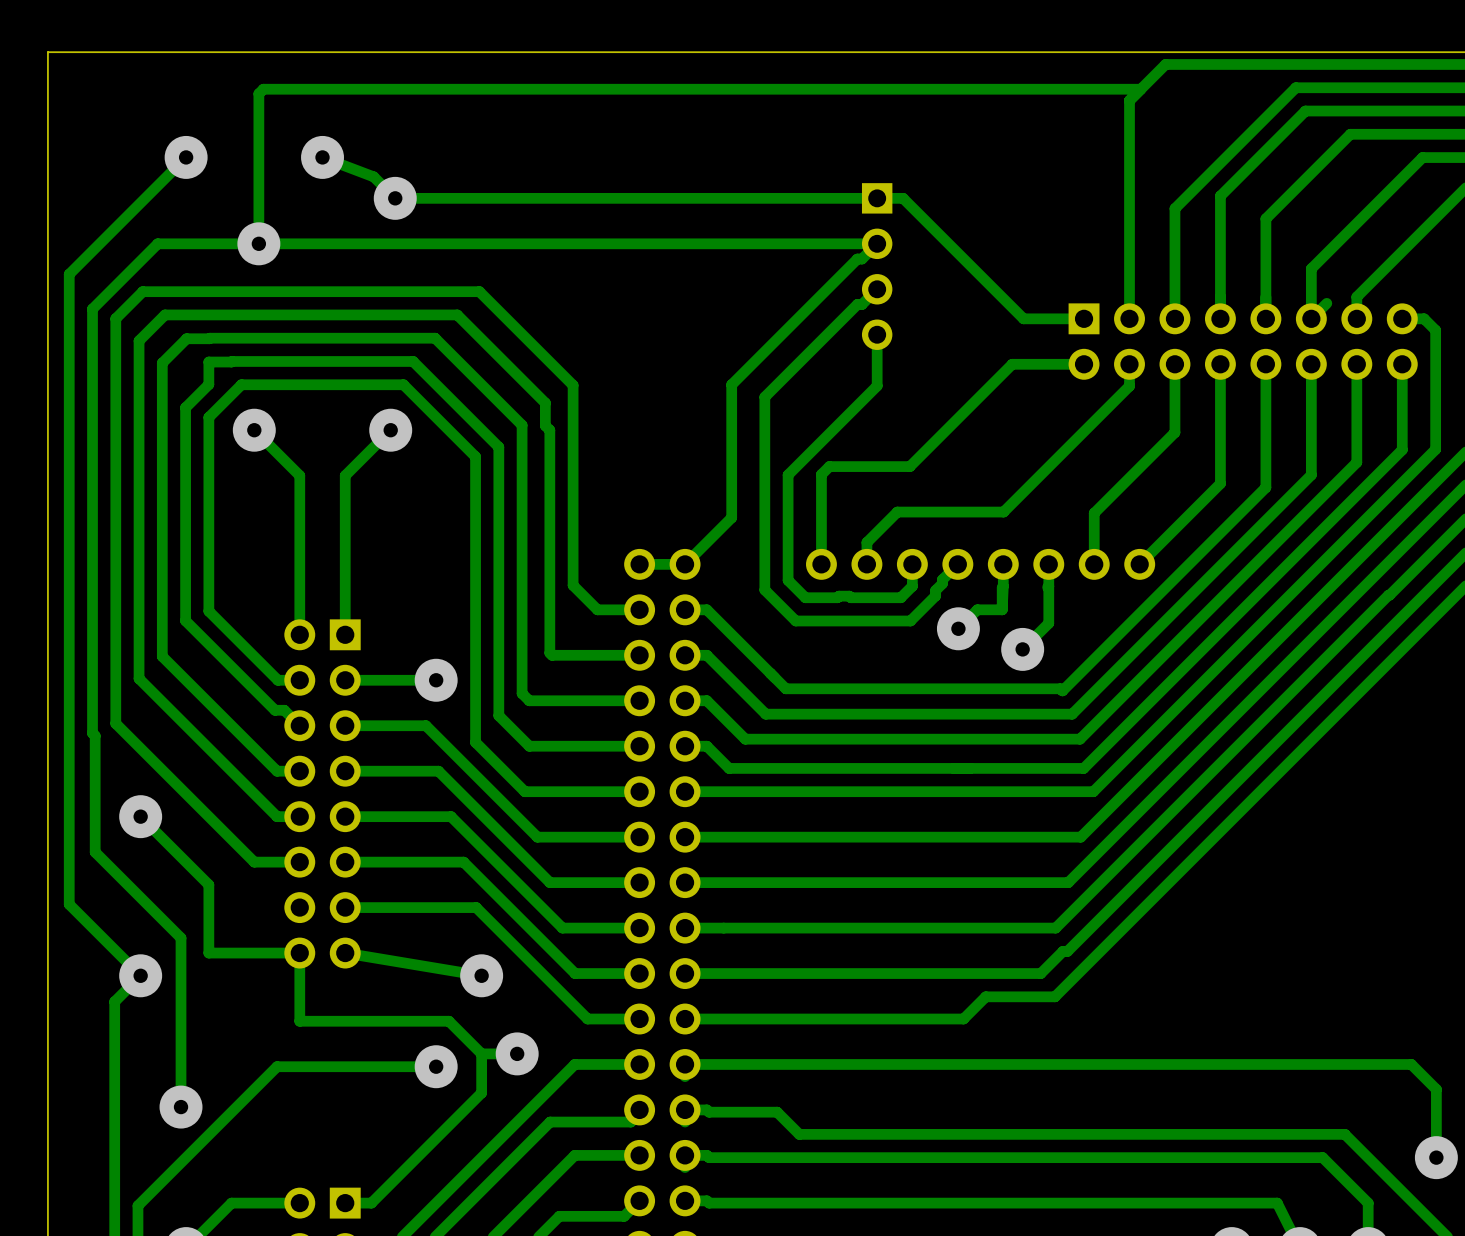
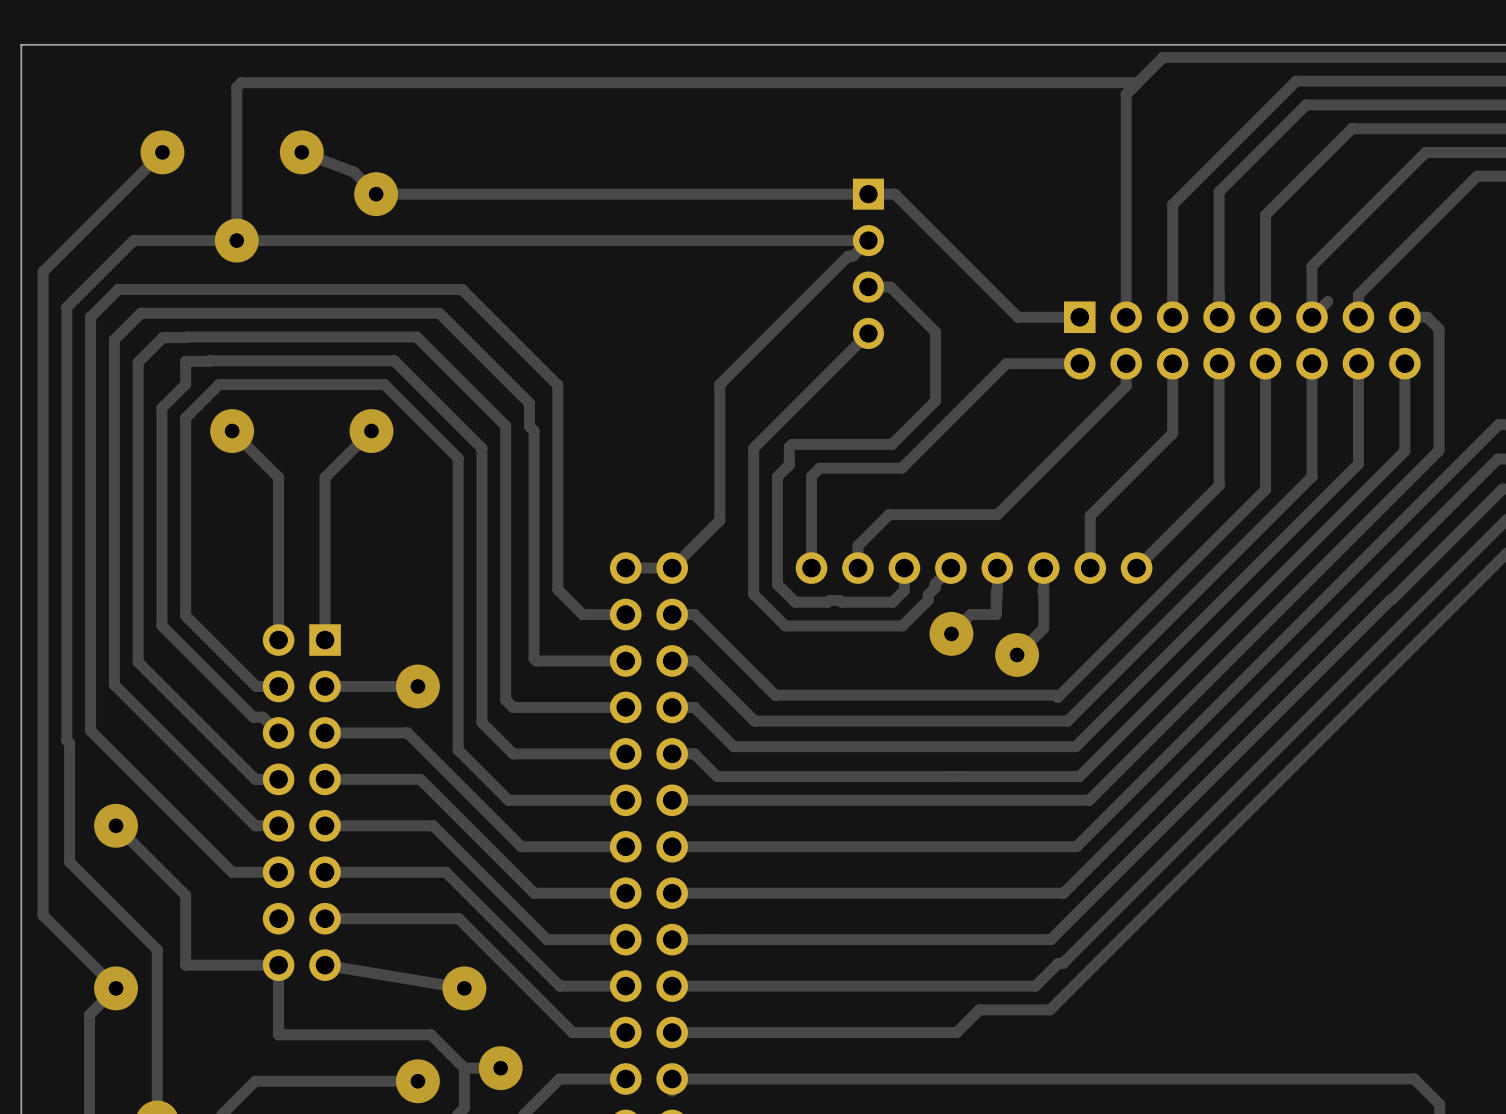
track: (877, 289) (861, 304) (857, 304) (764, 397) (764, 447) -> (868, 287) (890, 287) (935, 332) (935, 400) (892, 444) (792, 444) (789, 447) (789, 464)
track: (877, 334) (877, 385) (799, 463) -> (868, 333) (753, 448)

